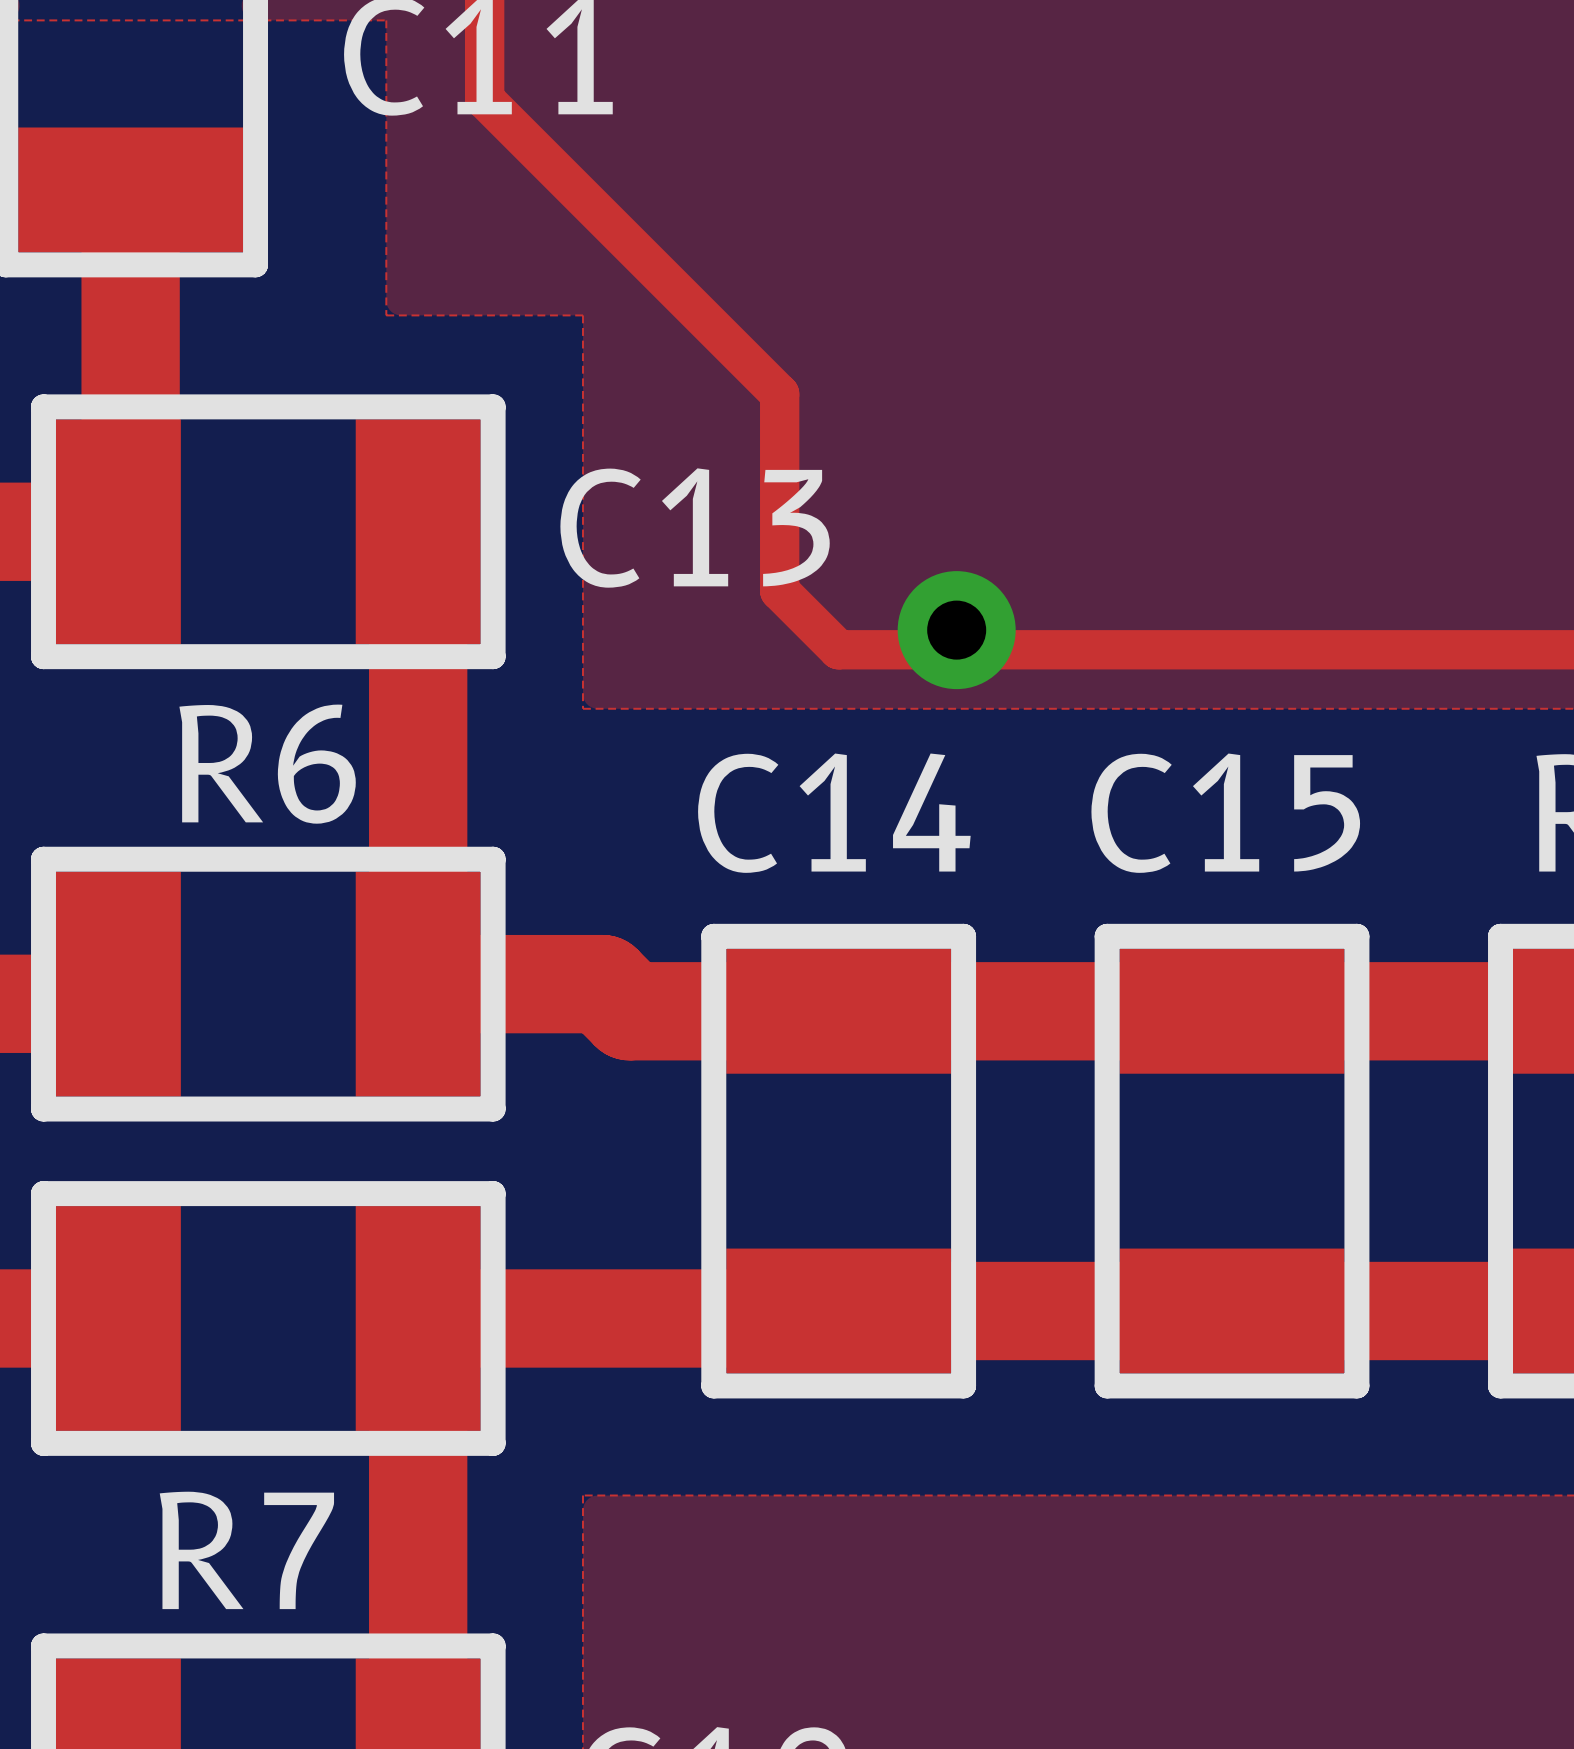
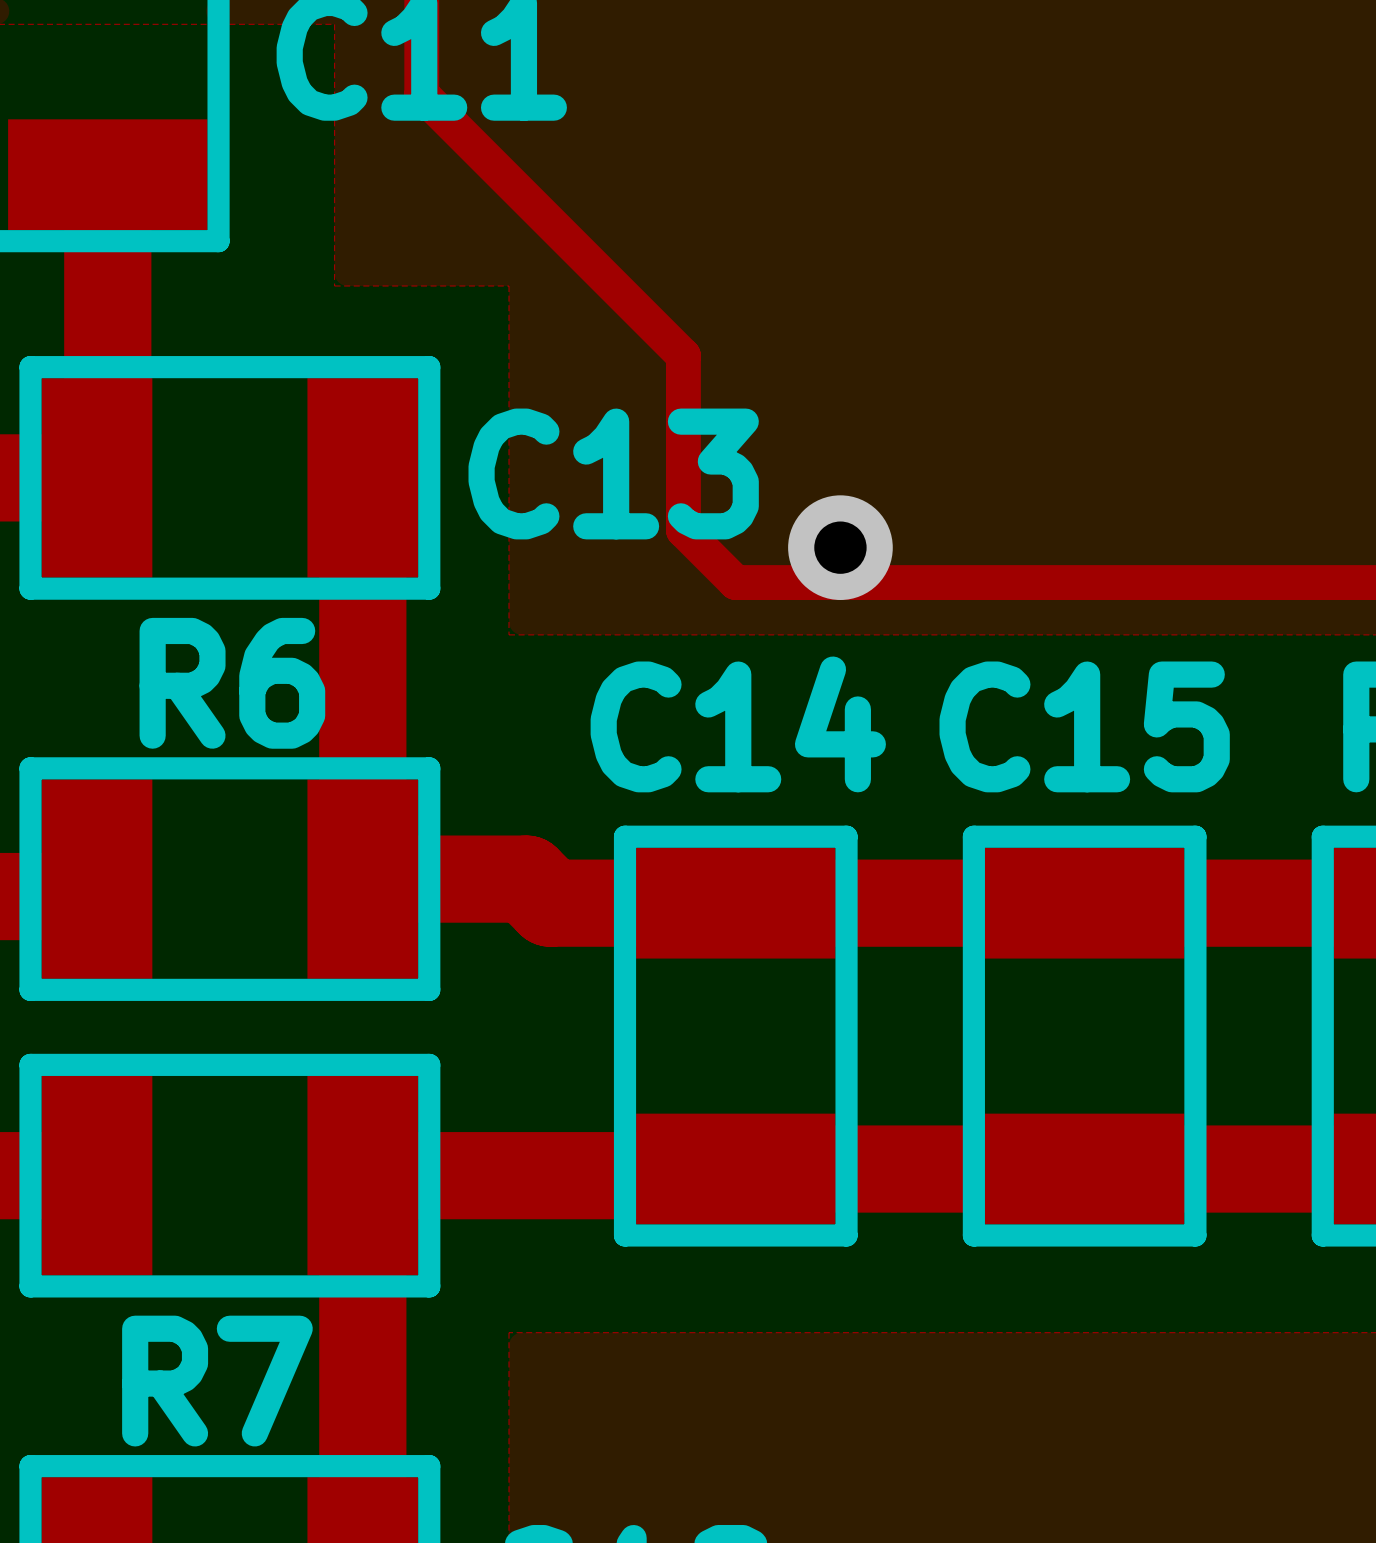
via position: (956, 630) -> (840, 547)

